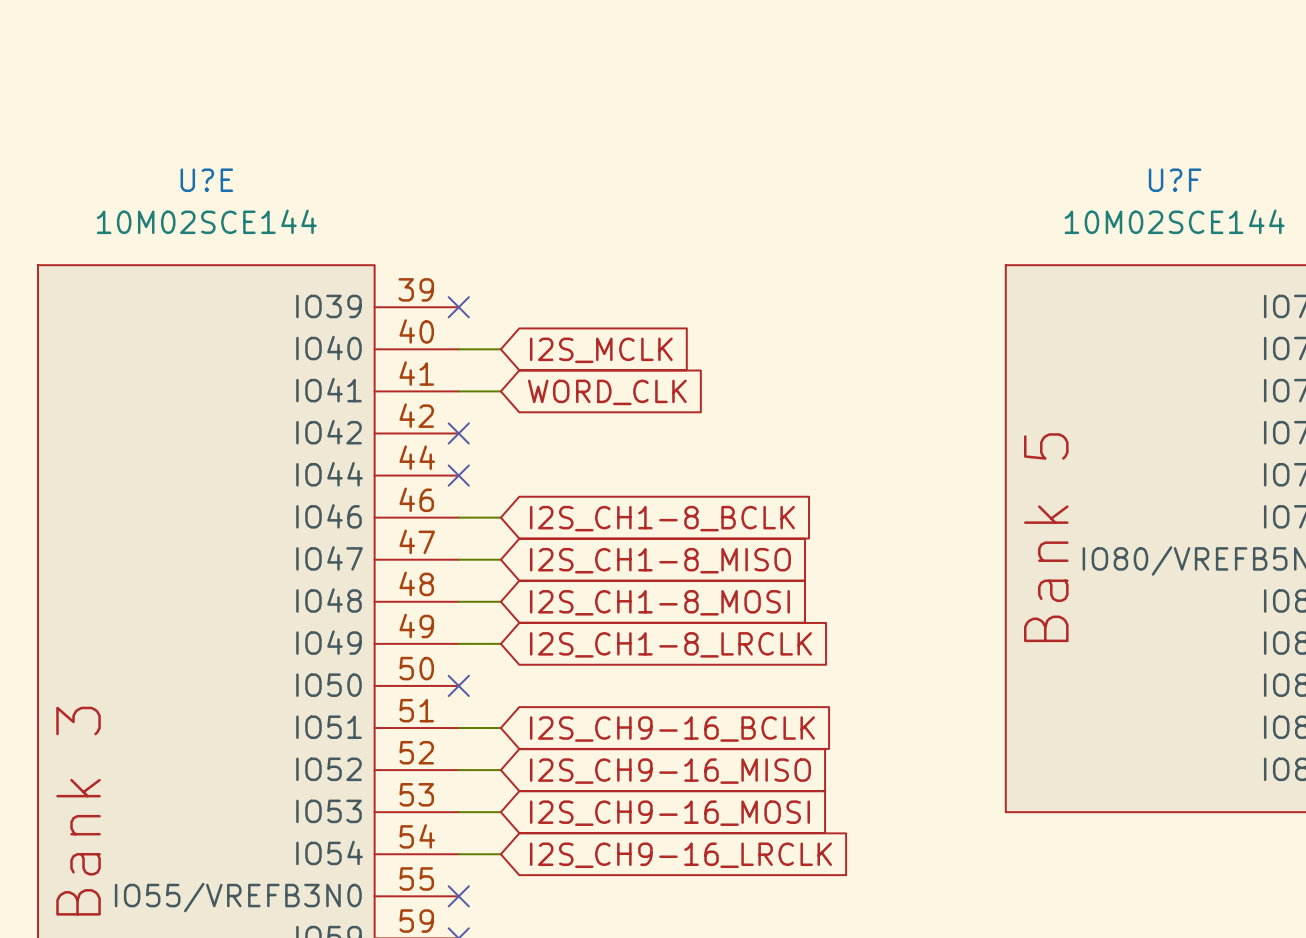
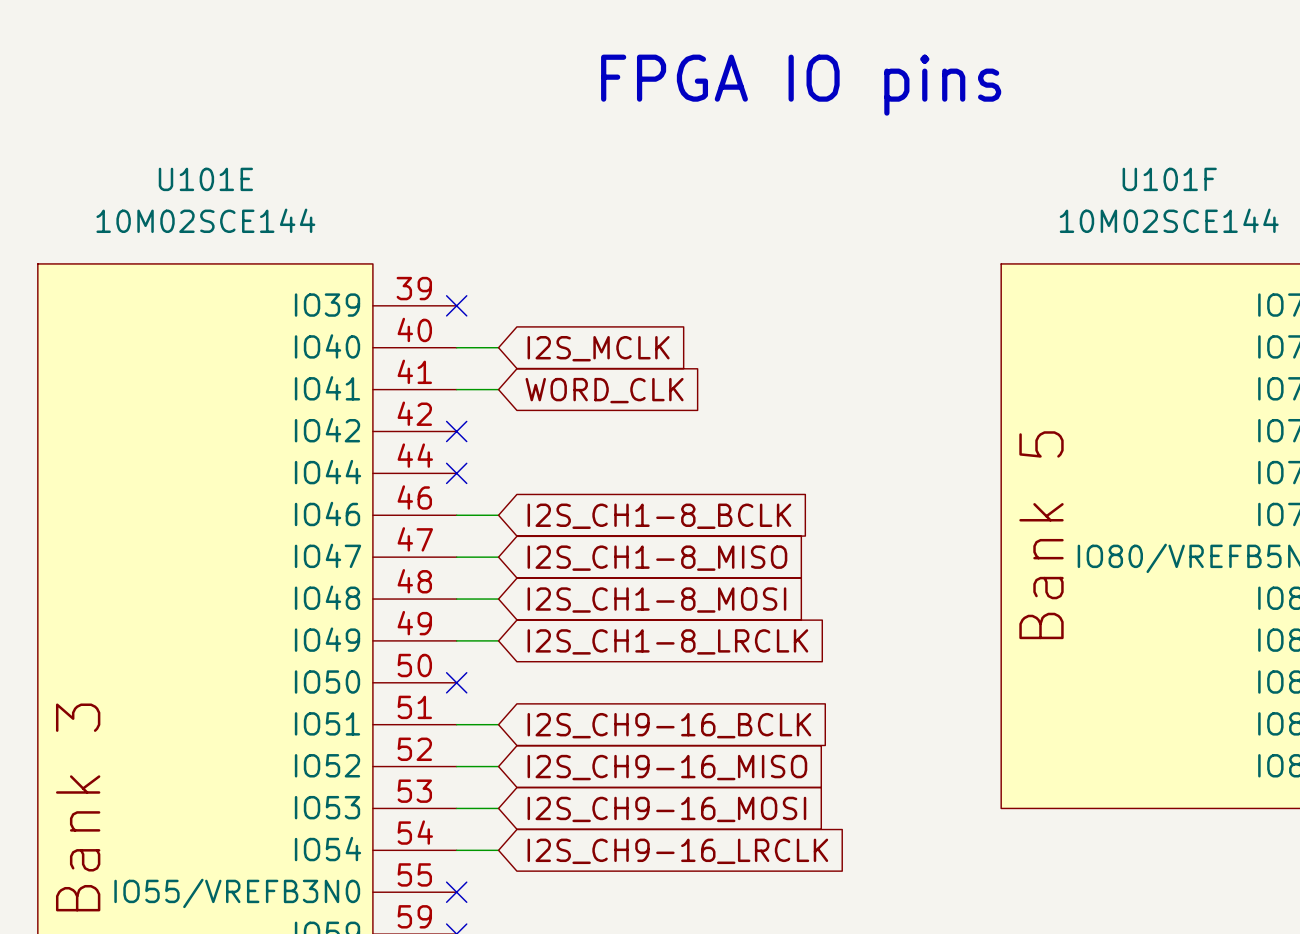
text: none -> FPGA IO pins (801, 85)
U?E name: U?E (206, 180) -> U101E (205, 179)
U?F name: U?F (1175, 180) -> U101F (1169, 179)

